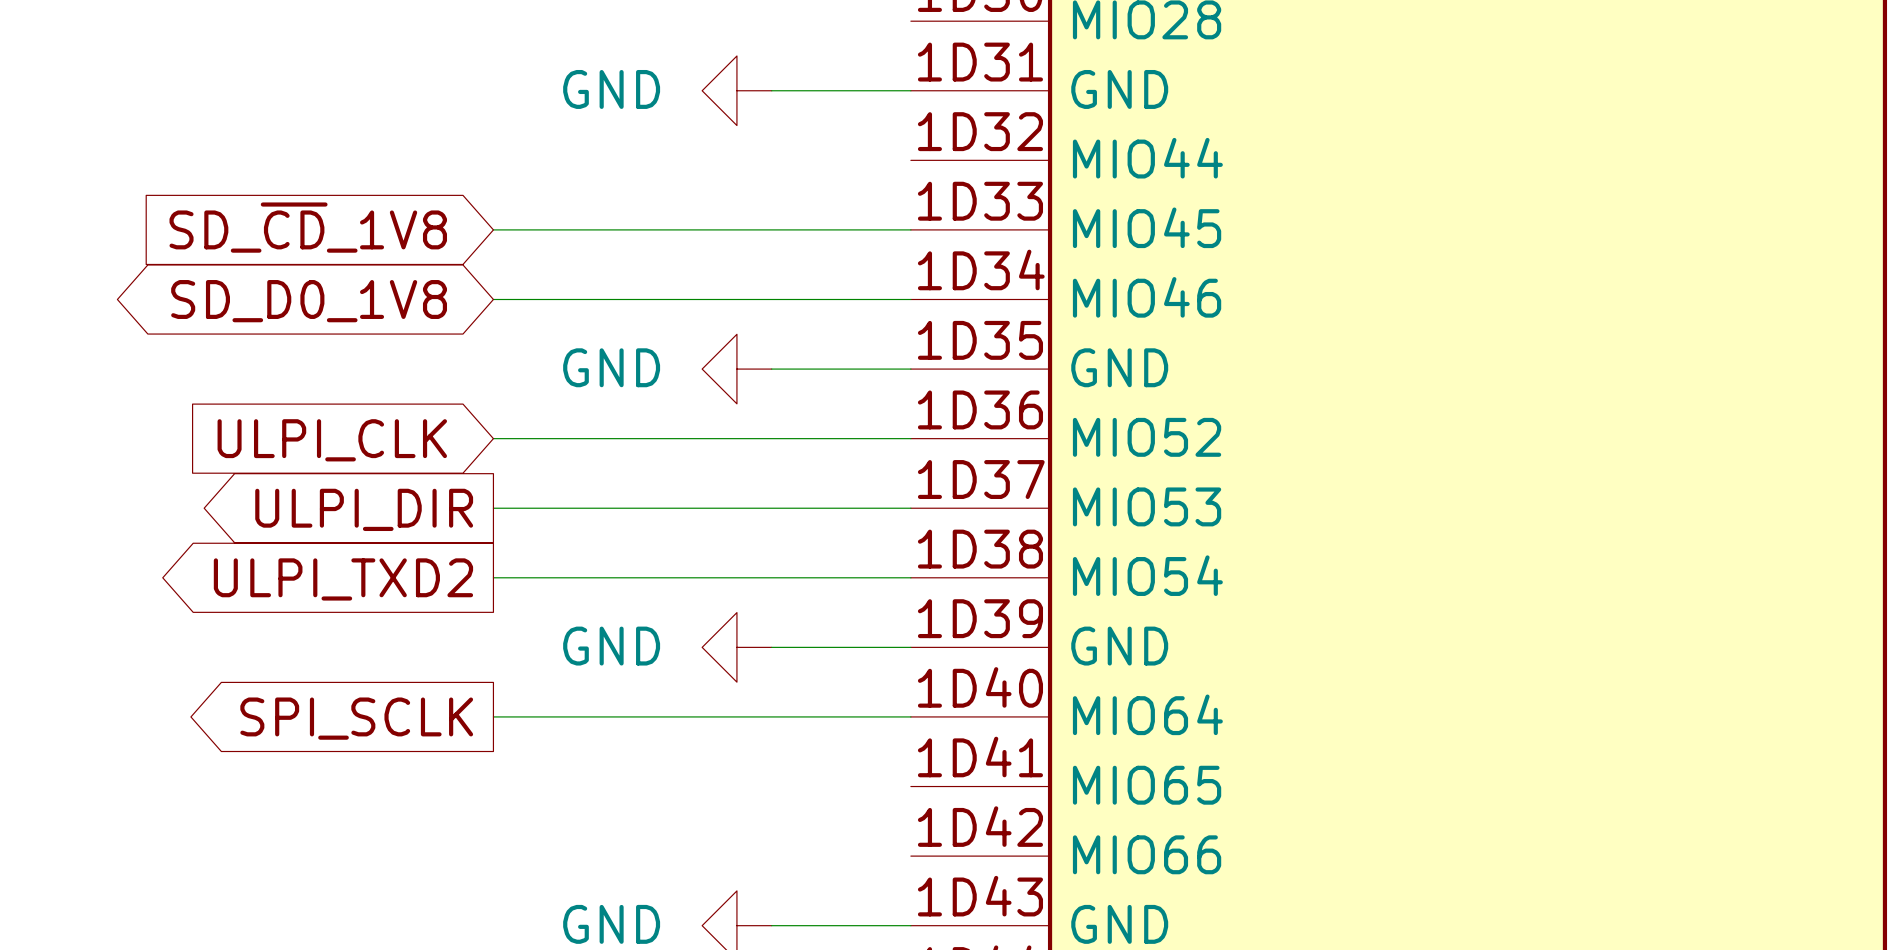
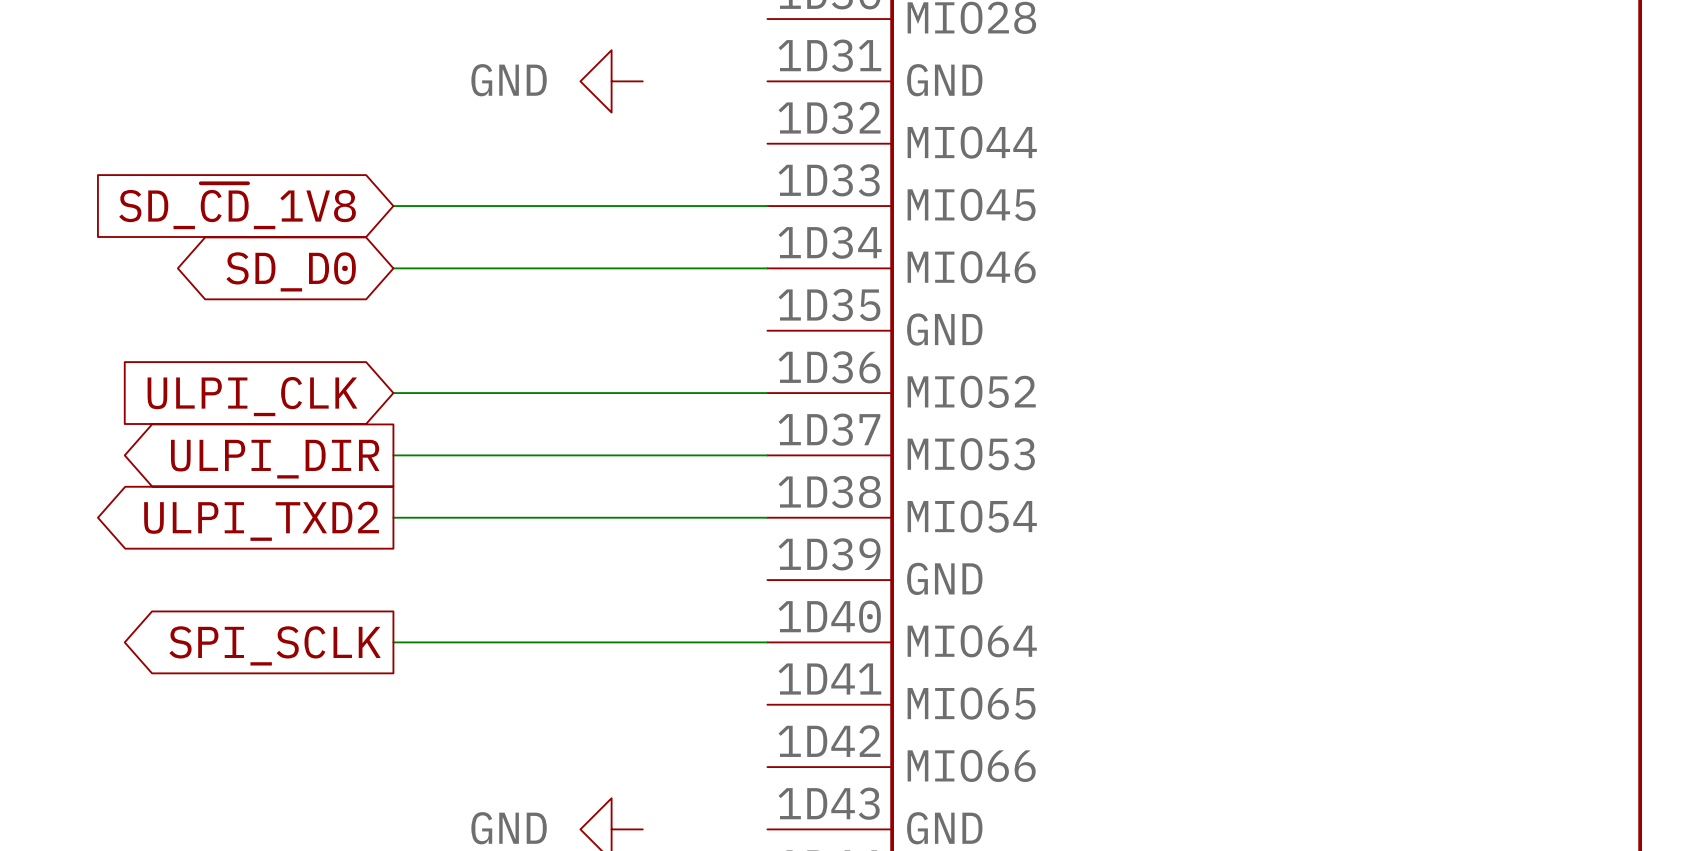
wire: (771, 90) (910, 90) -> none
global label: SD_D0_1V8 (309, 301) -> SD_D0 (291, 271)
power symbol: GND (736, 369) -> none
wire: (771, 369) (910, 369) -> none
power symbol: GND (736, 647) -> none
wire: (771, 647) (910, 647) -> none
wire: (771, 925) (910, 925) -> none

